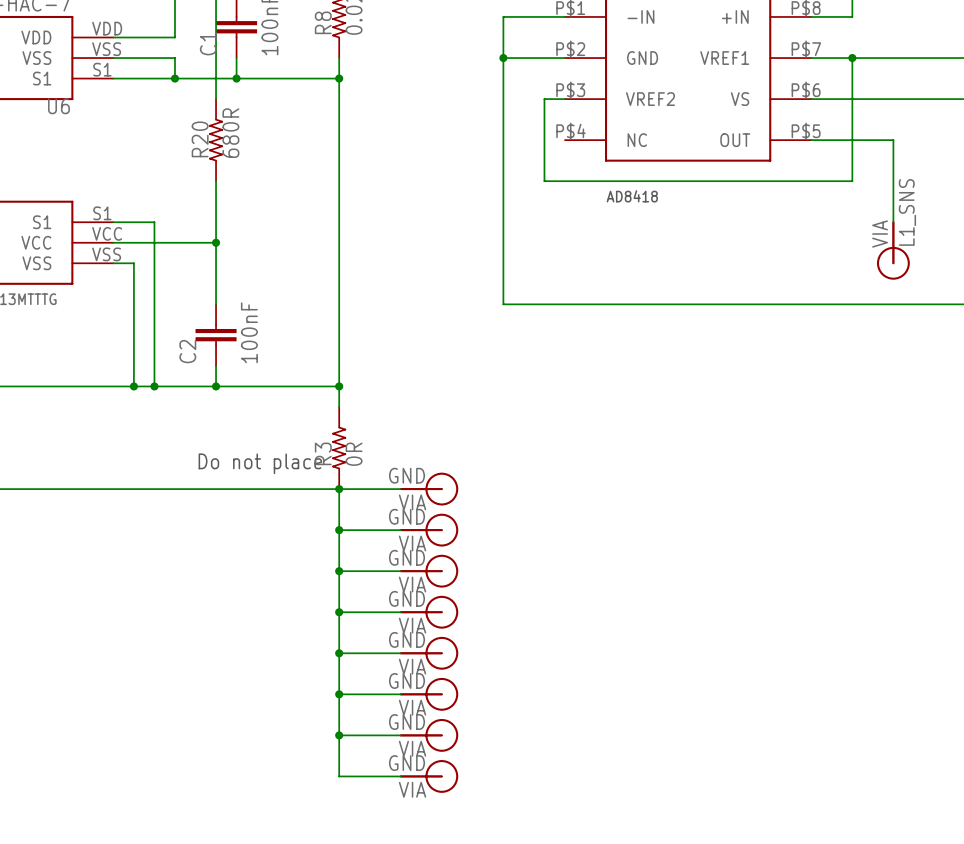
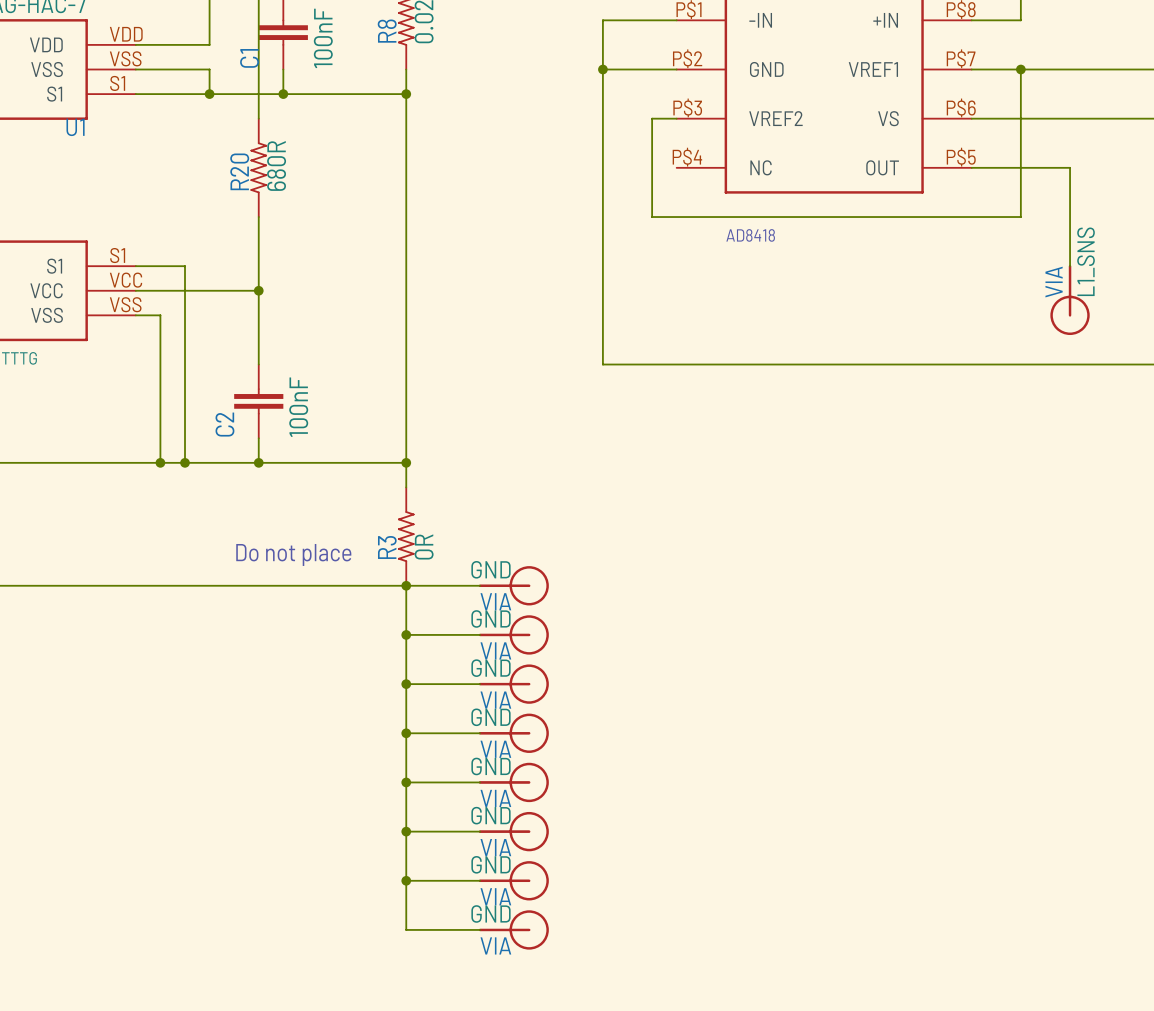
U6 name: U6 (58, 106) -> U1 (75, 127)

